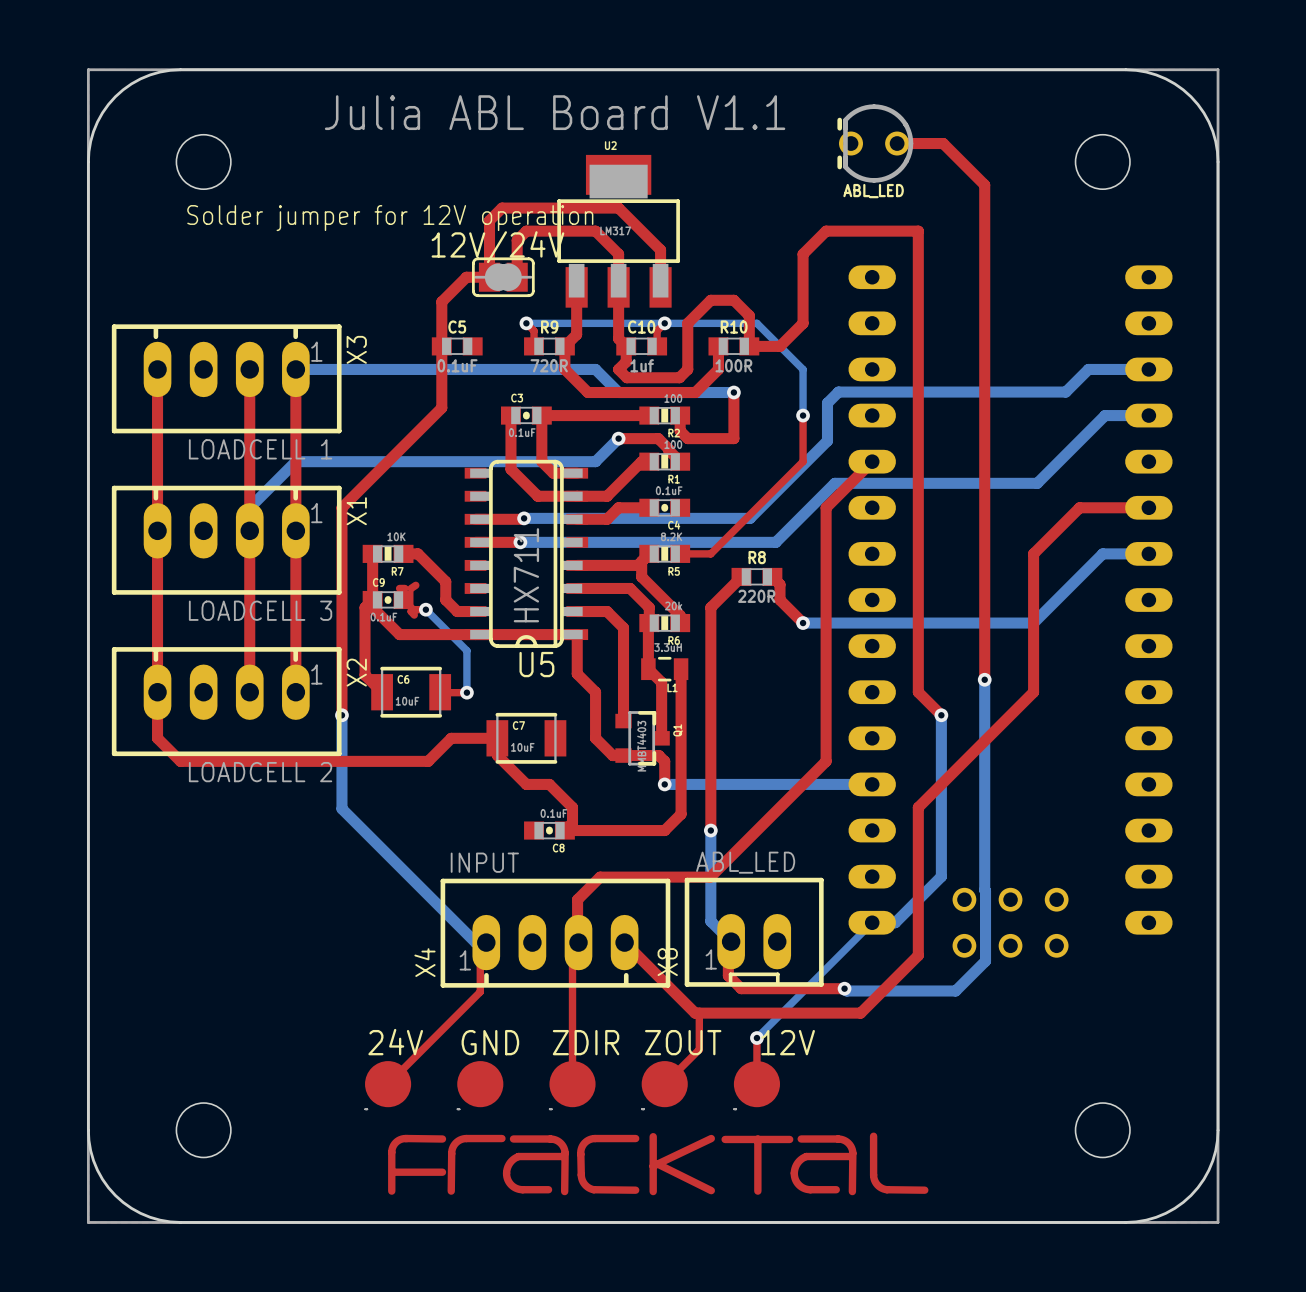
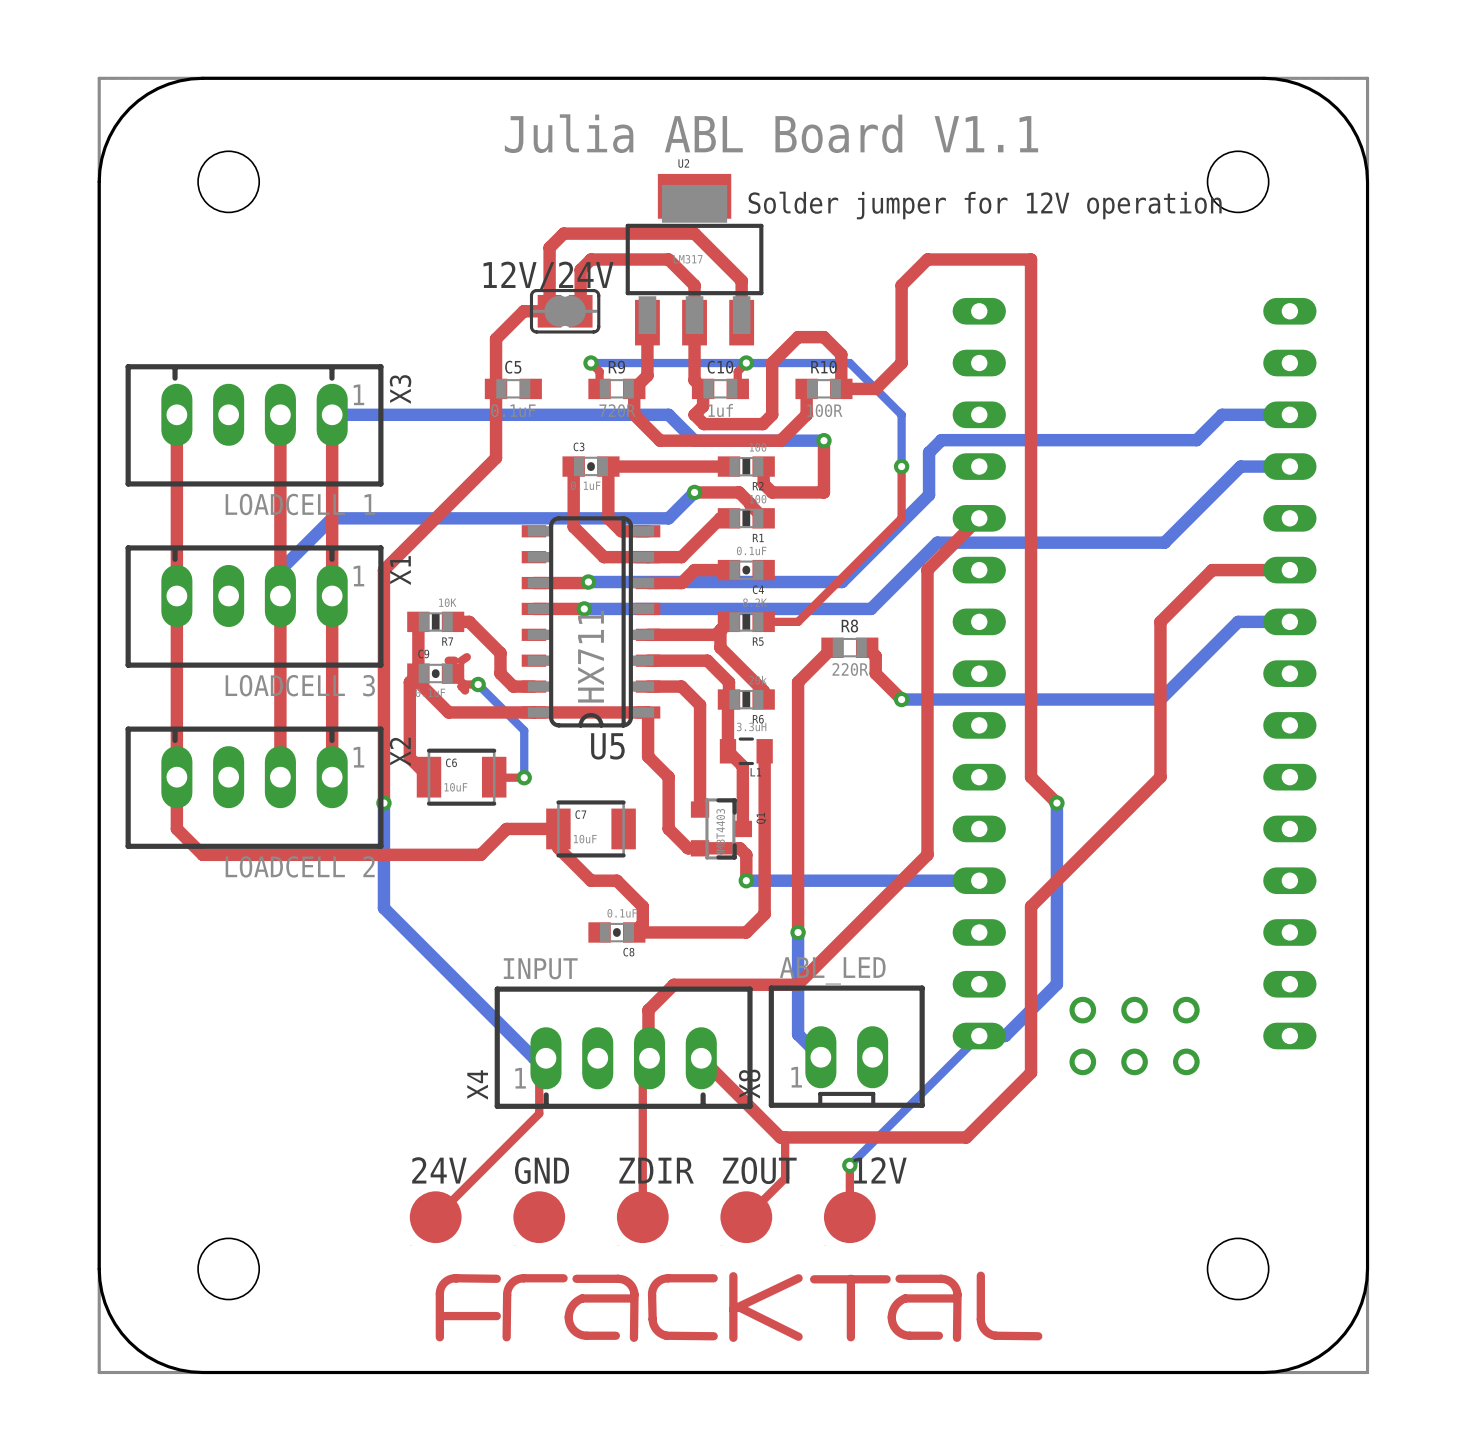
text position: Julia ABL Board V1.1 (555, 112) -> Julia ABL Board V1.1 (771, 133)
ABL_LED: (875, 143) -> none
top track: (897, 143) (943, 143) (984, 185) (984, 679) -> none
text: none -> Solder jumper for 12V operation (985, 205)
text: Solder jumper for 12V operation (390, 218) -> none
bottom track: (984, 679) (985, 961) (955, 991) (846, 991) (844, 988) -> none
via: (984, 679) -> none
top track: (731, 941) (728, 944) (728, 975) (741, 988) (844, 988) -> none
via: (844, 988) -> none

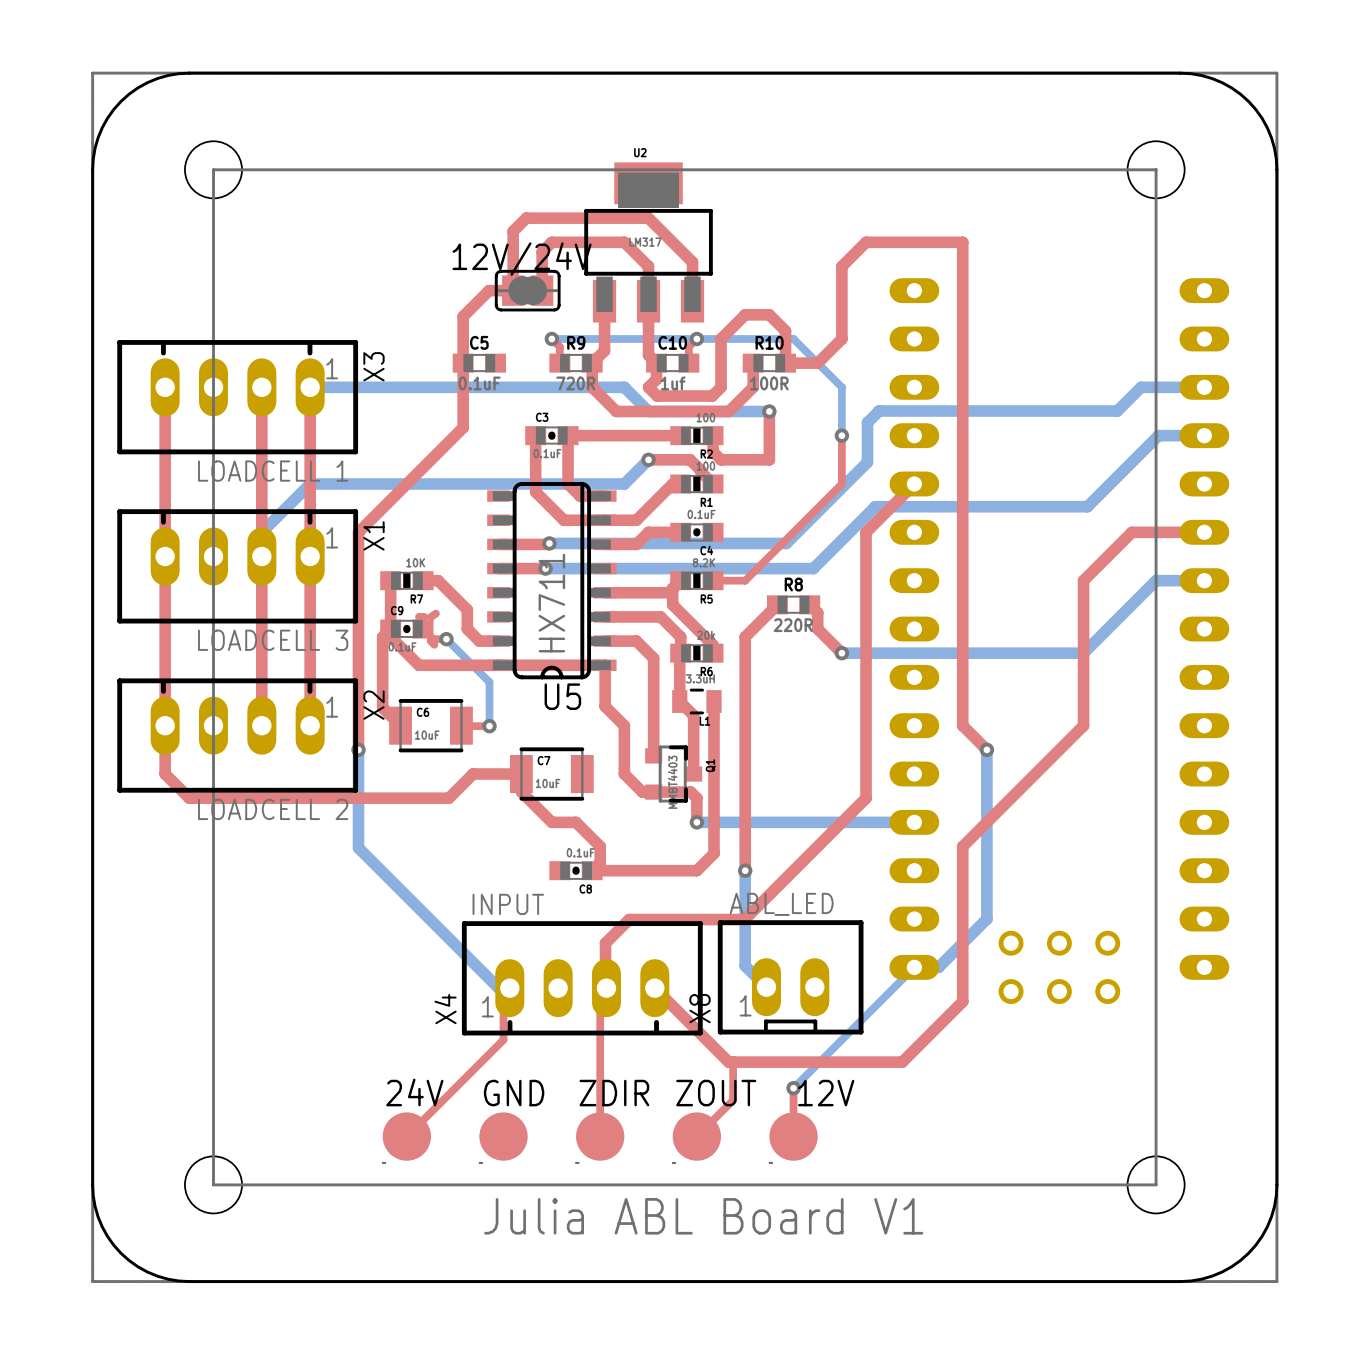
text: Julia ABL Board V1.1 (771, 133) -> none
line: none -> (213, 169) (1156, 169) (1156, 1184) (213, 1184) (213, 169)
text: Solder jumper for 12V operation (985, 205) -> none
drawing: [435, 1271, 1043, 1342] -> none
text: none -> Julia ABL Board V1 (703, 1216)

